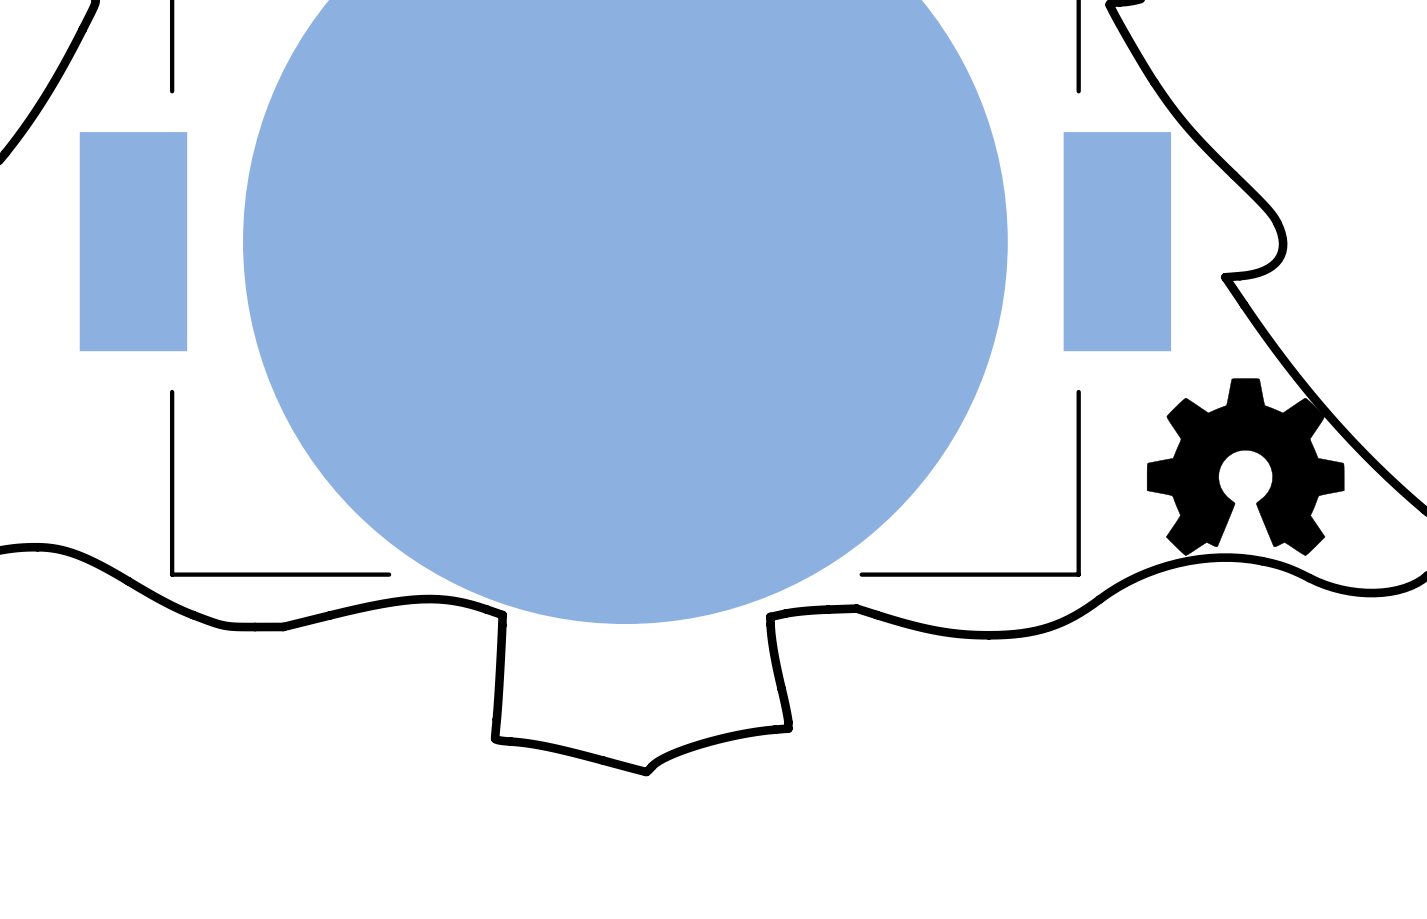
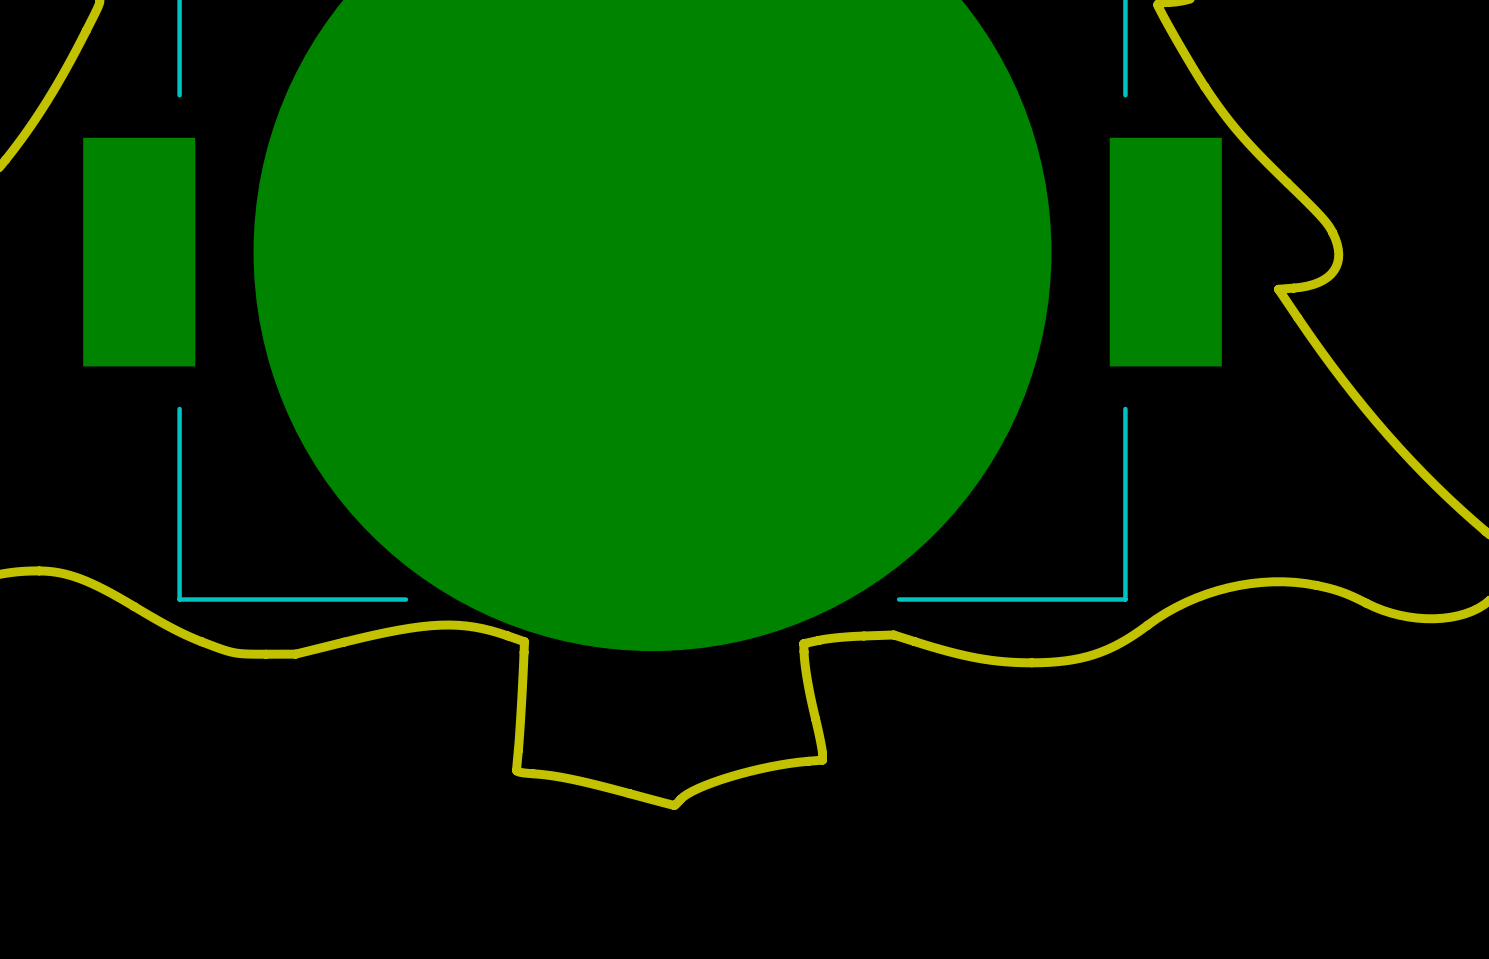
drawing: [1146, 378, 1345, 556] -> none

